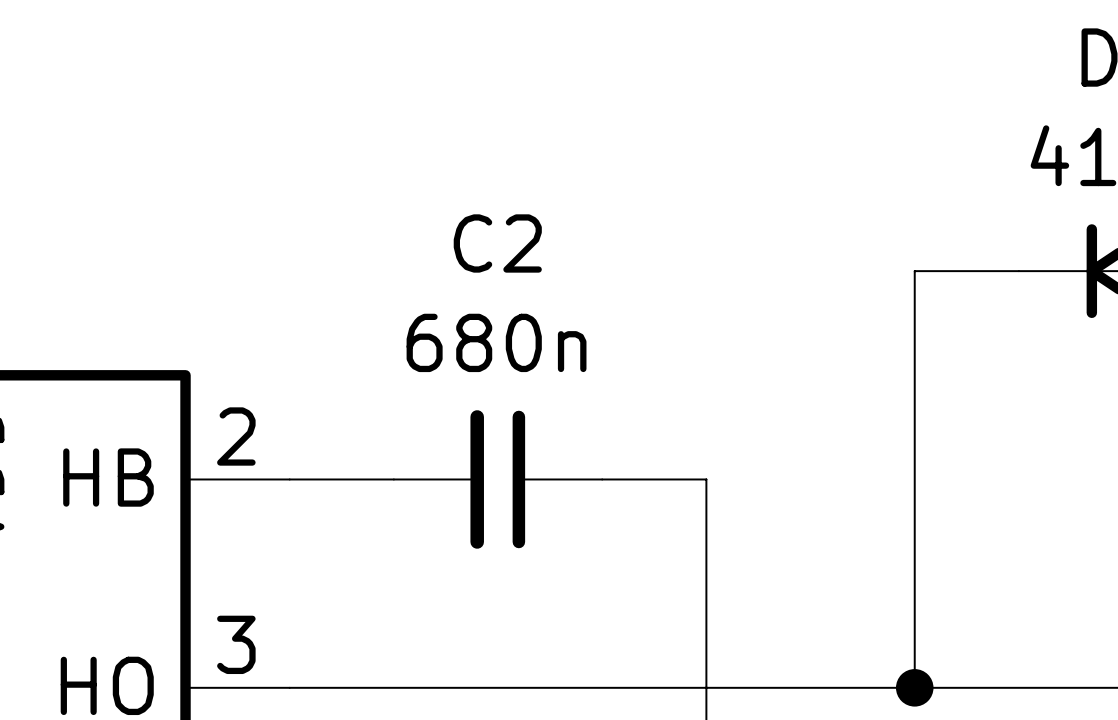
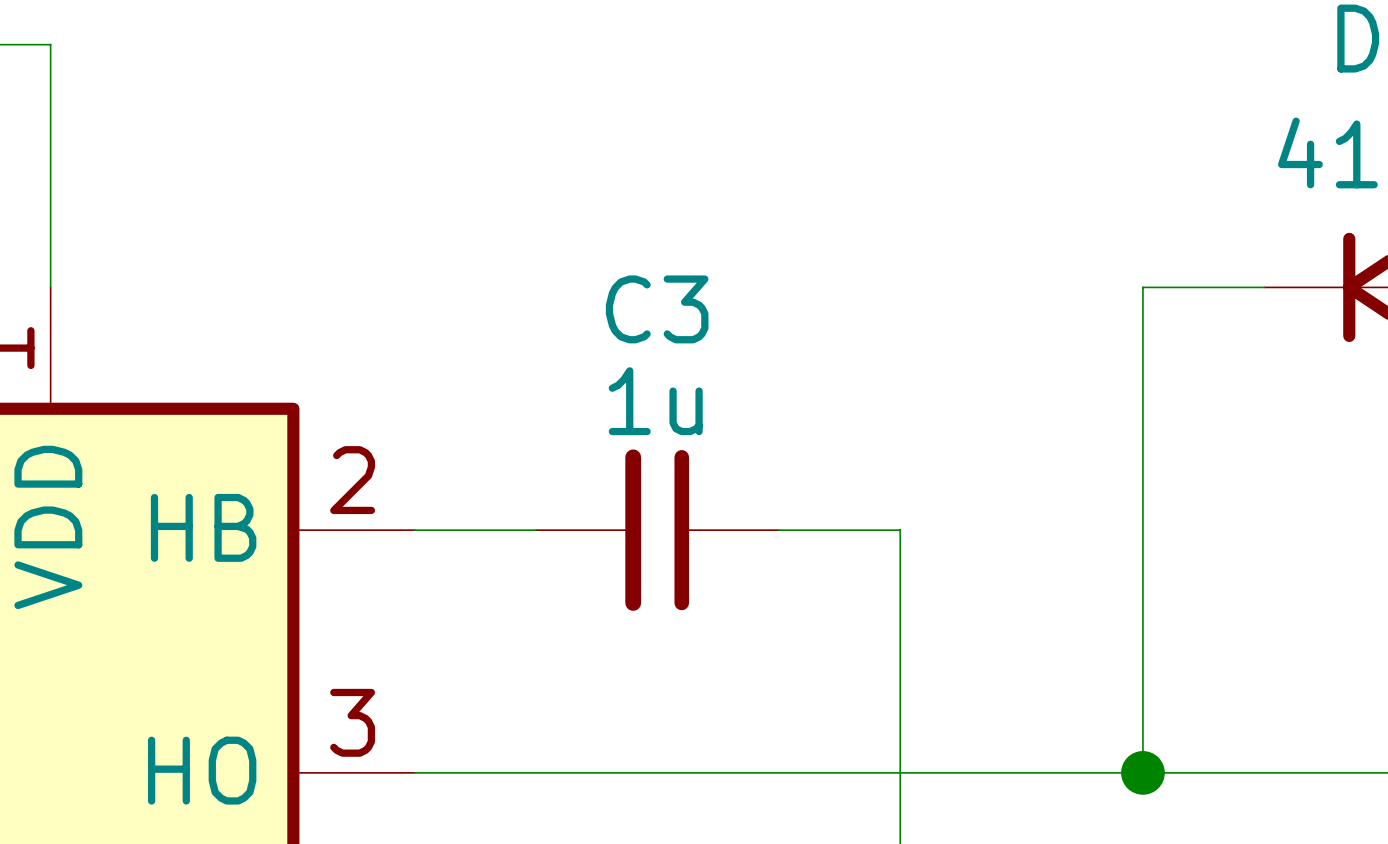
C2 name: C2 (497, 243) -> C3 (657, 309)
C2 value: 680n (496, 342) -> 1u (655, 401)

